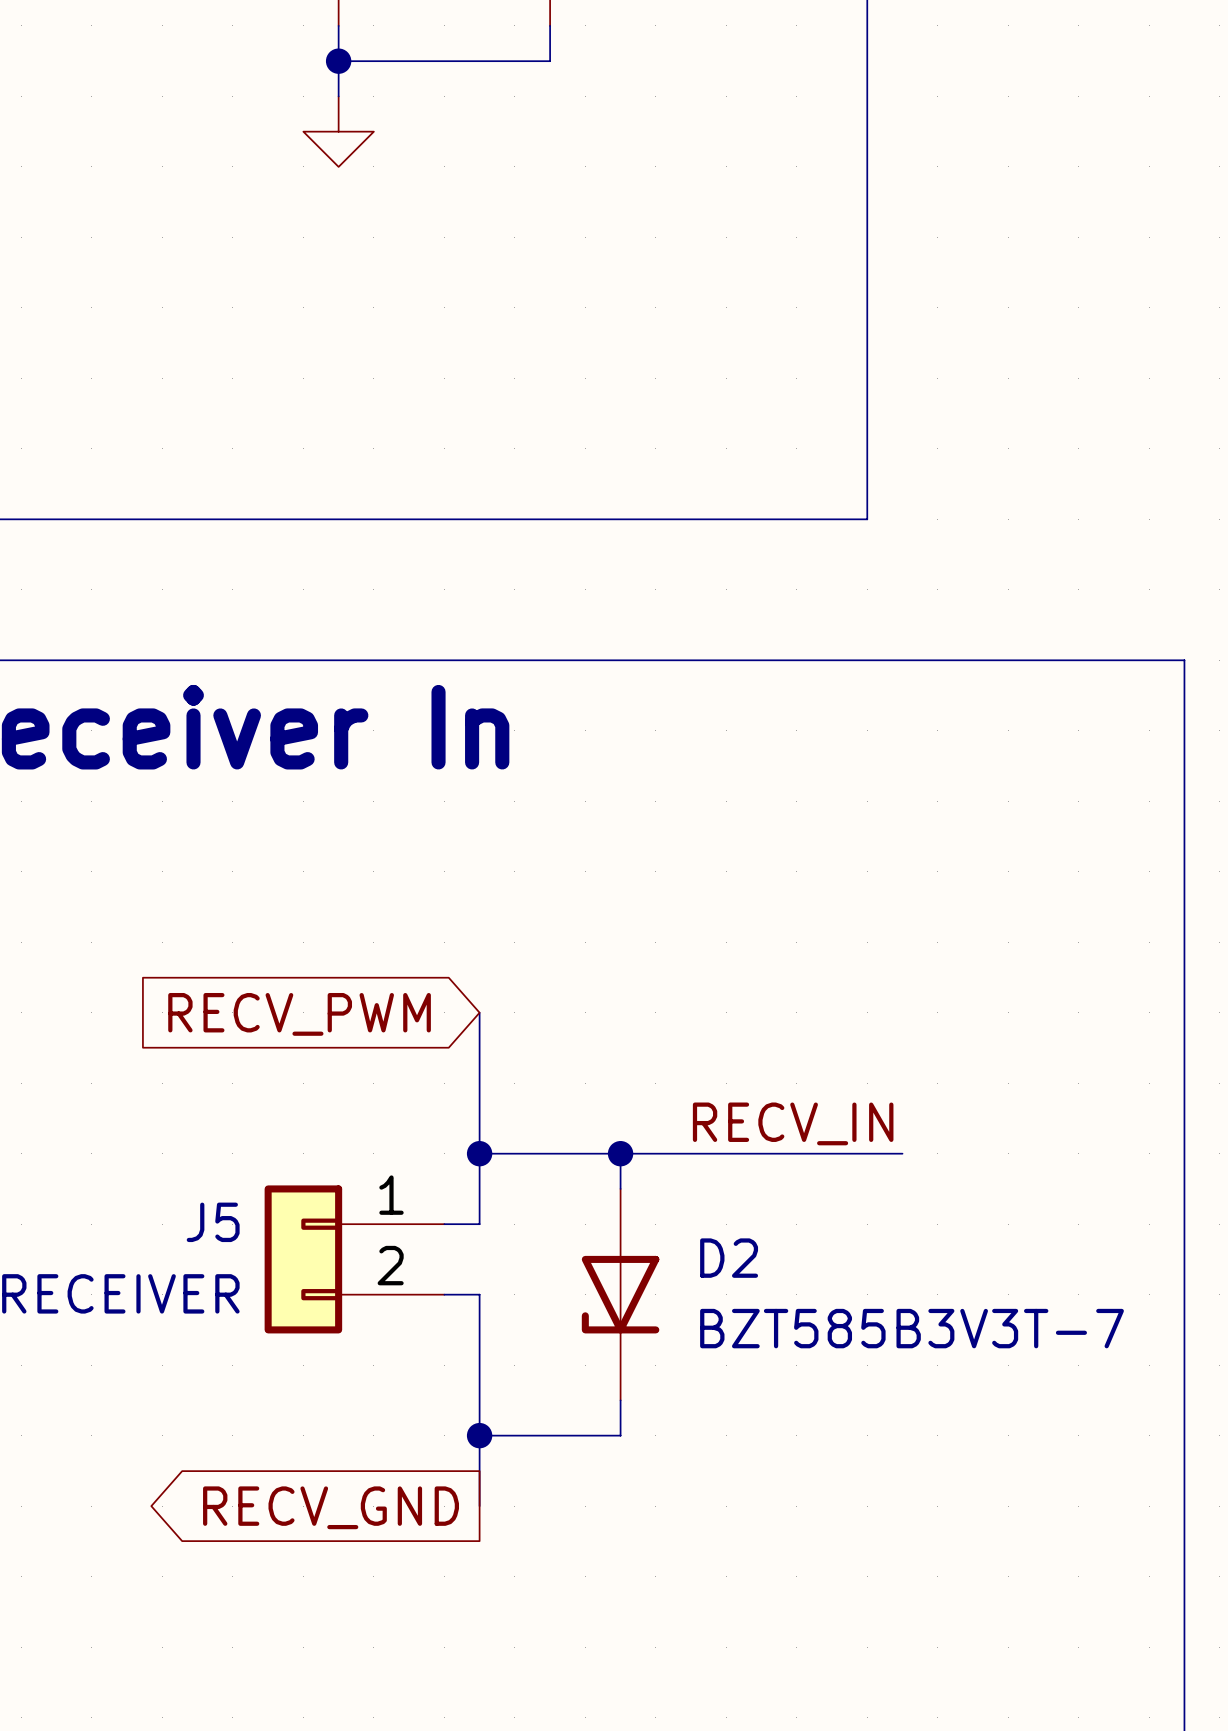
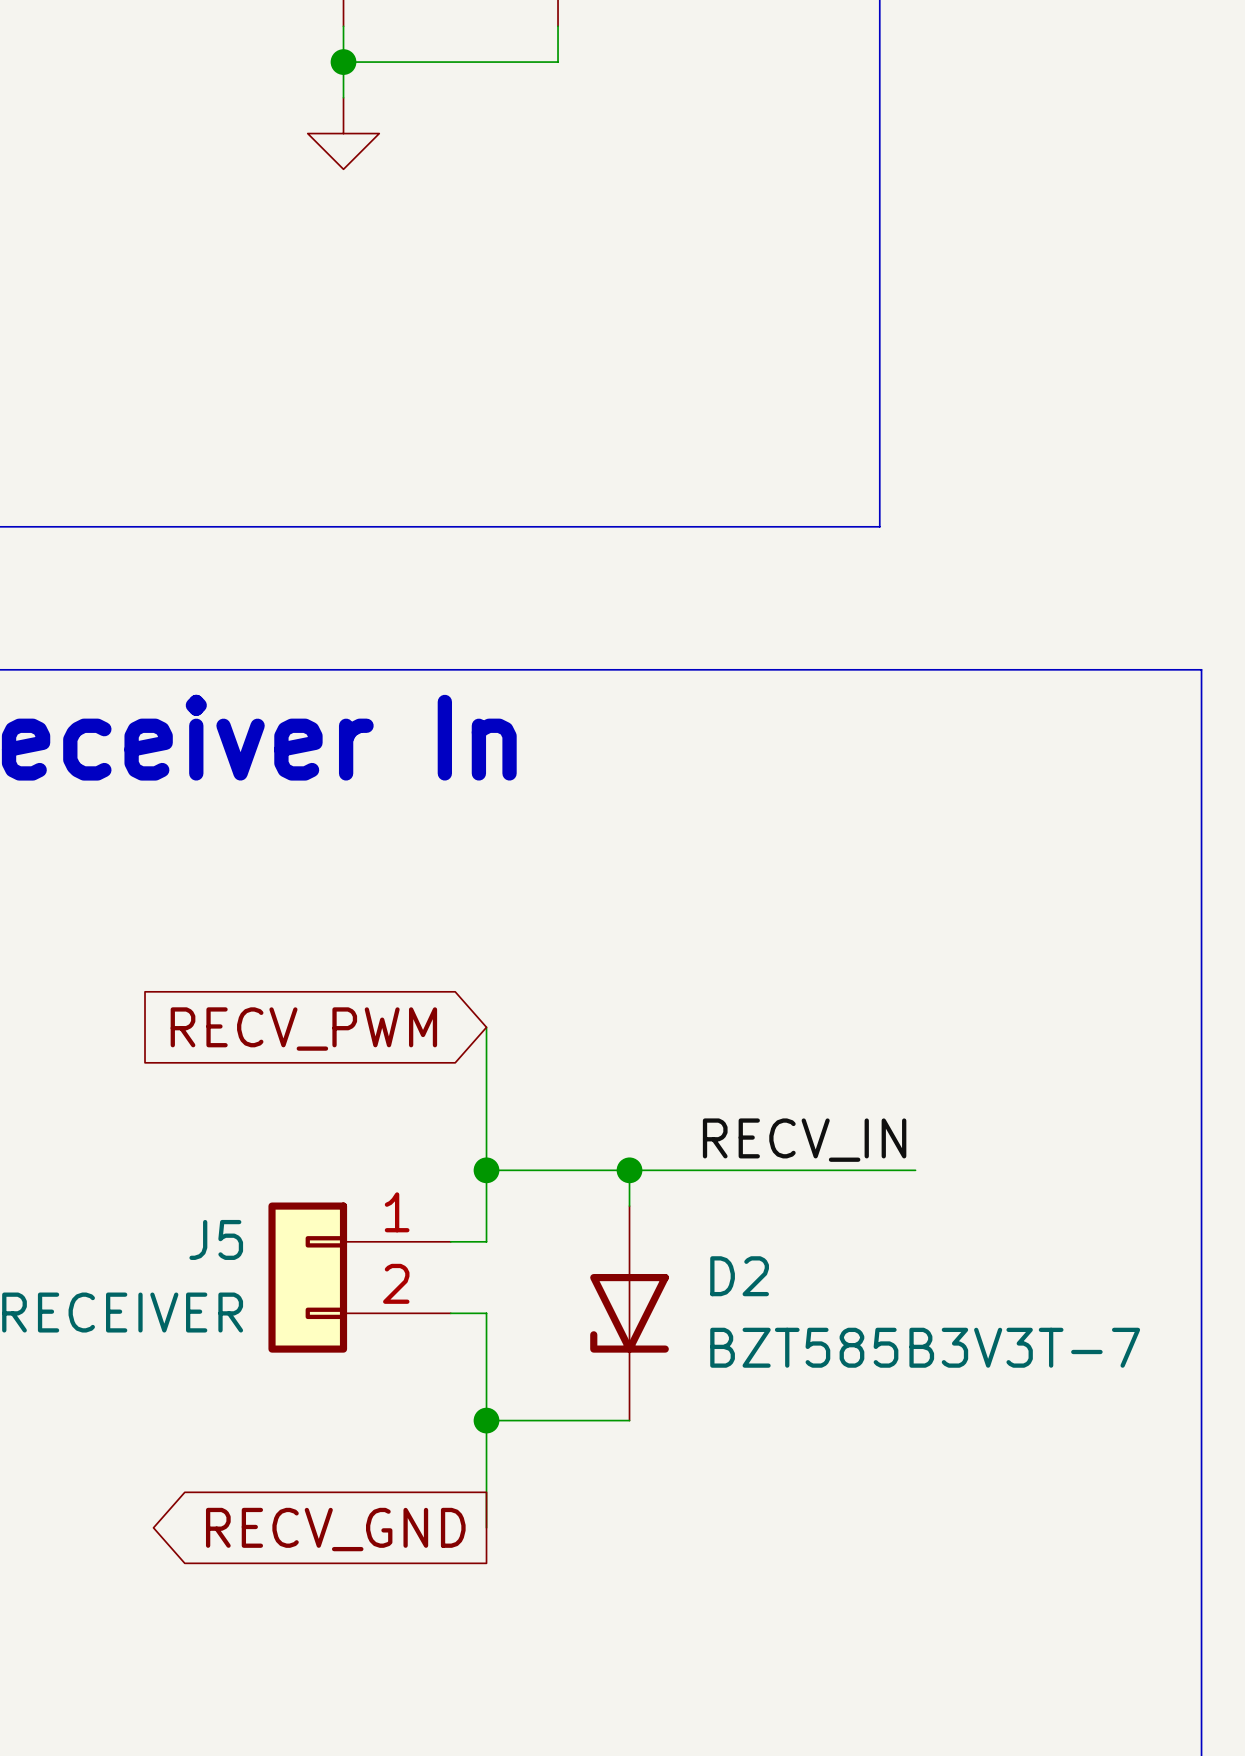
wire: (620, 1400) (620, 1435) (479, 1435) -> (629, 1420) (486, 1420)
junction position: (479, 1435) -> (486, 1420)

